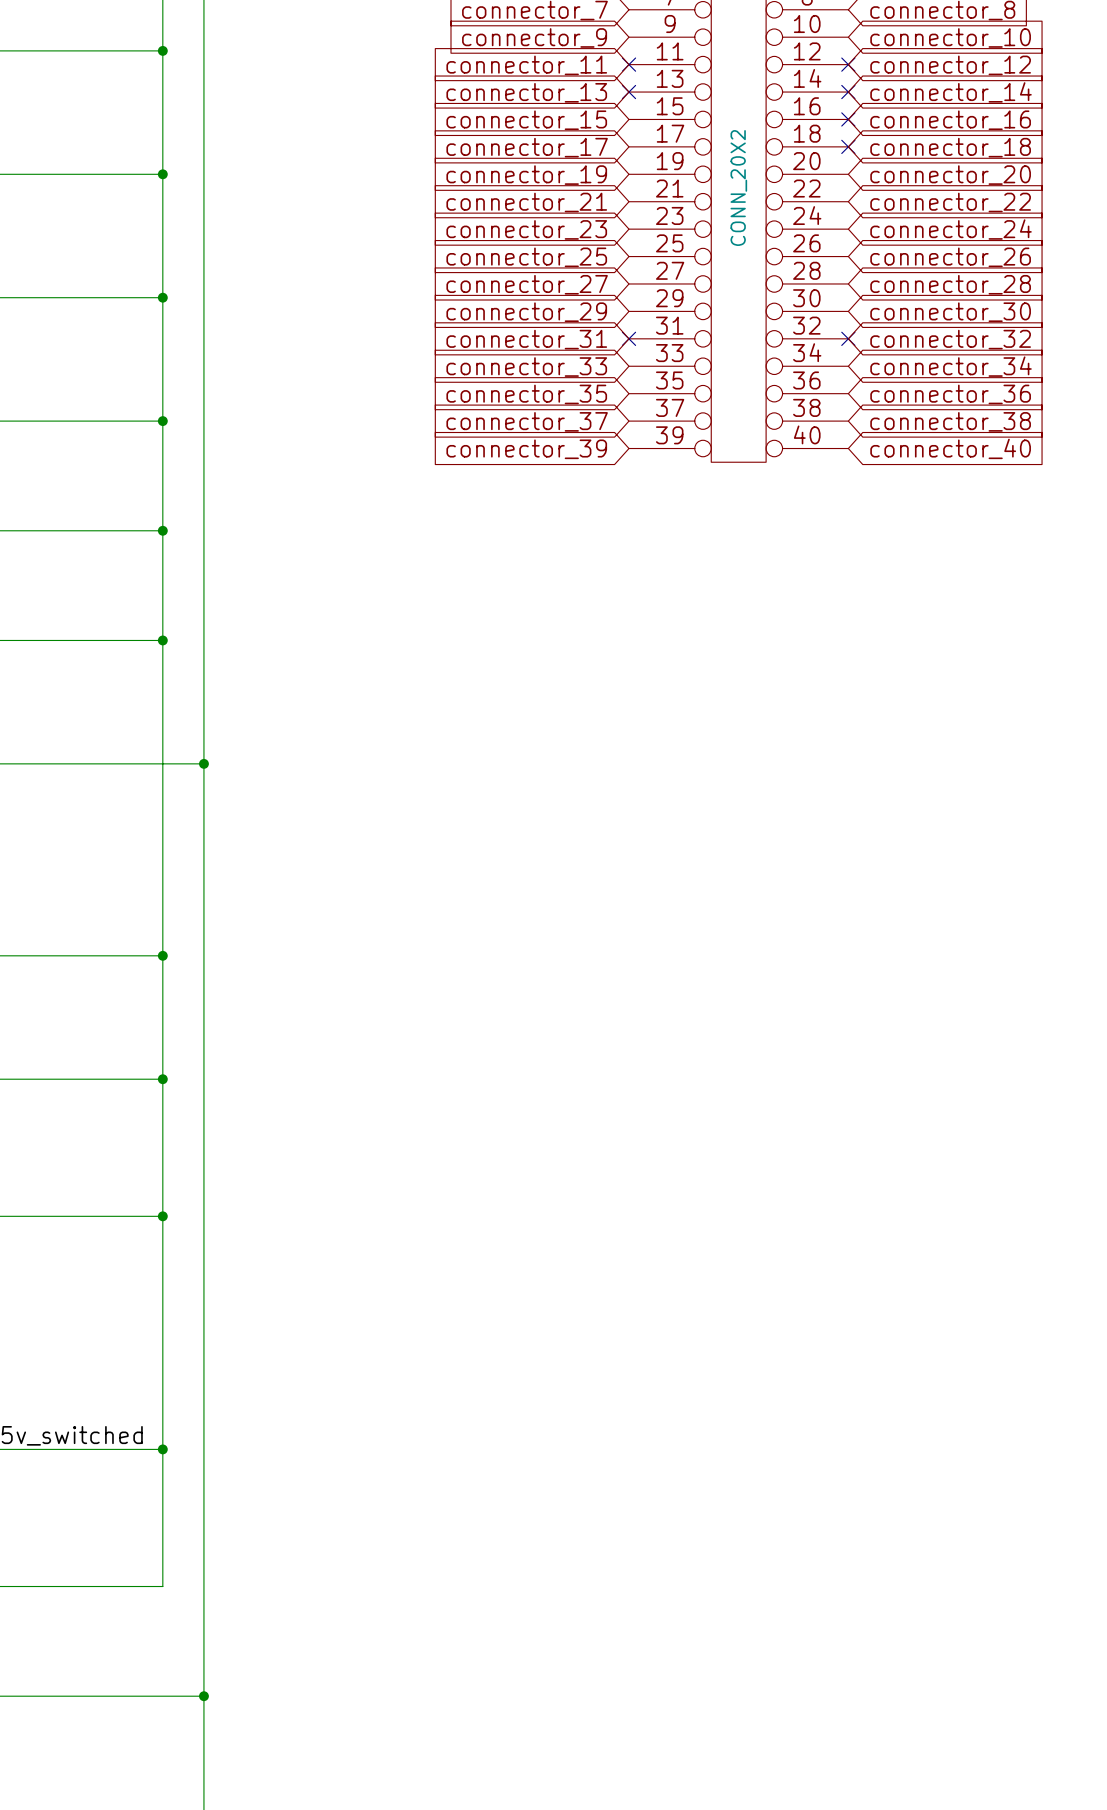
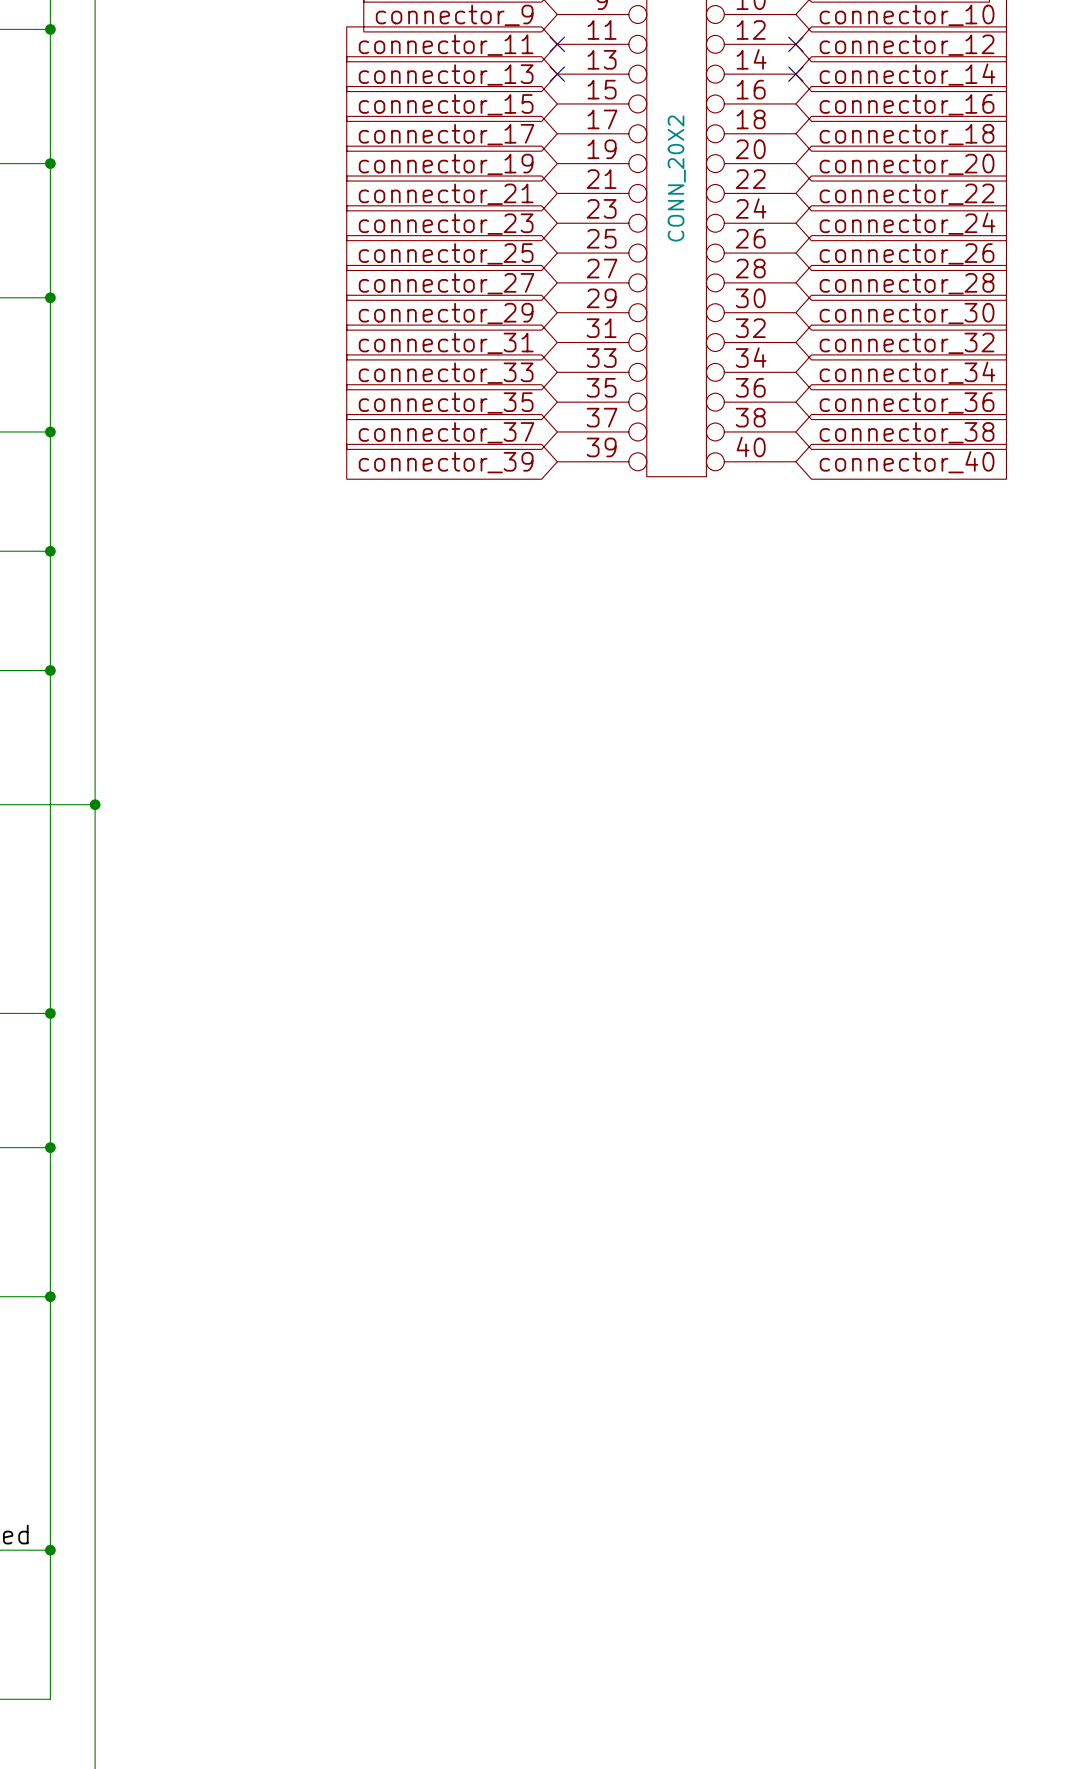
no-connect mark: (848, 119) -> none
no-connect mark: (848, 146) -> none
no-connect mark: (628, 338) -> none
no-connect mark: (848, 338) -> none

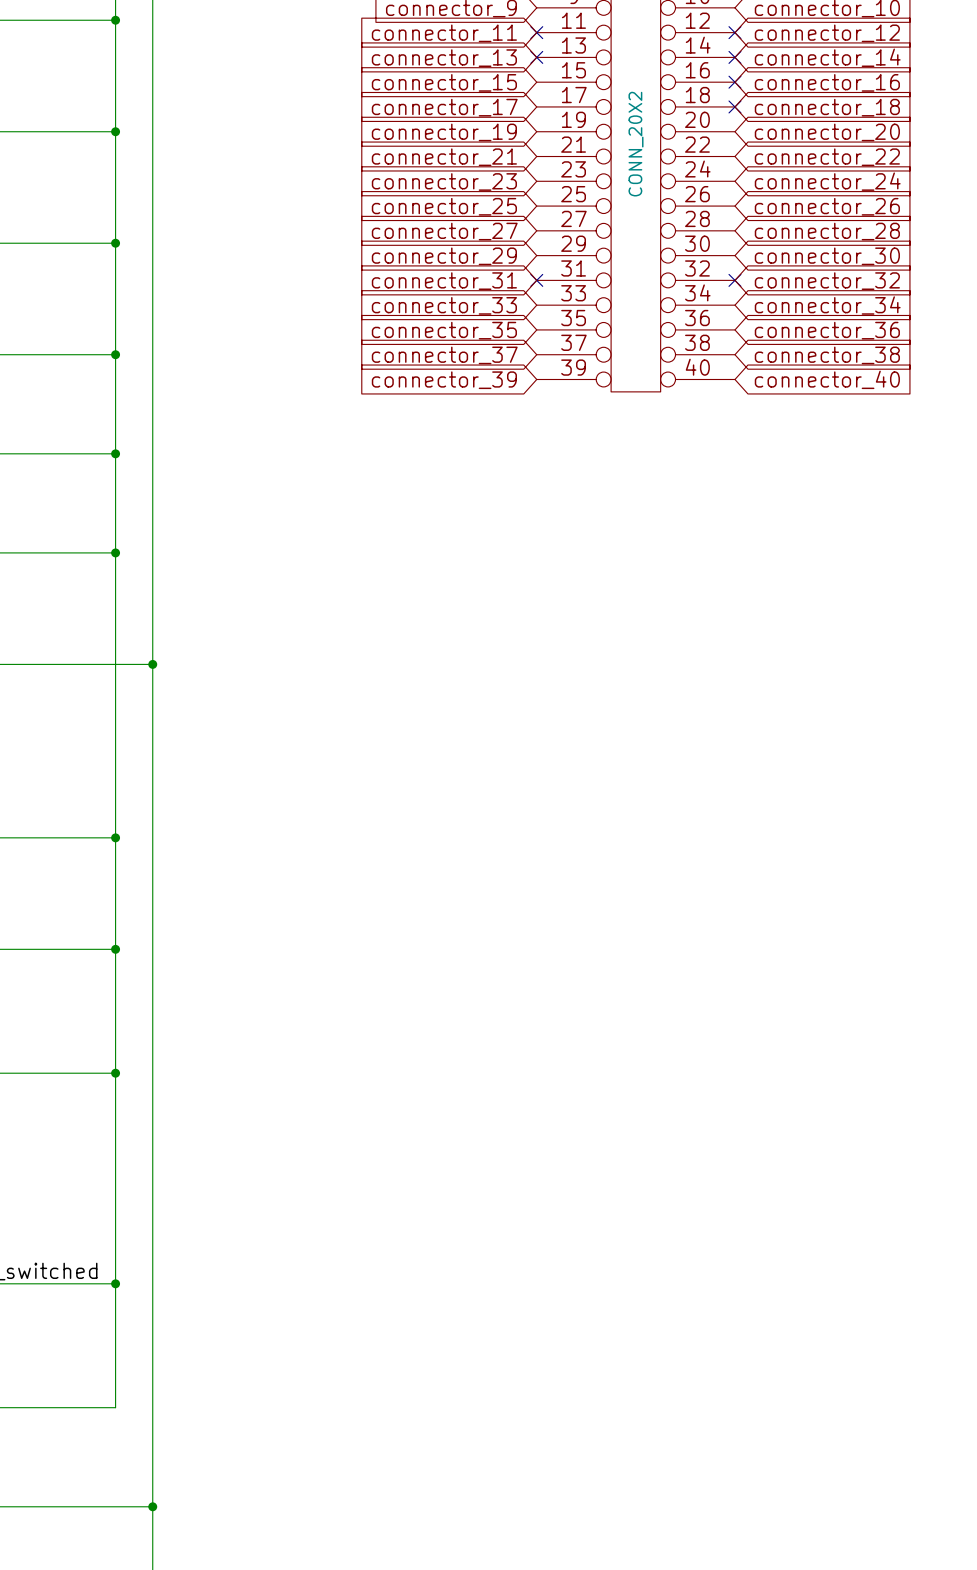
no-connect mark: none -> (734, 82)
no-connect mark: none -> (734, 106)
no-connect mark: none -> (536, 280)
no-connect mark: none -> (734, 280)

